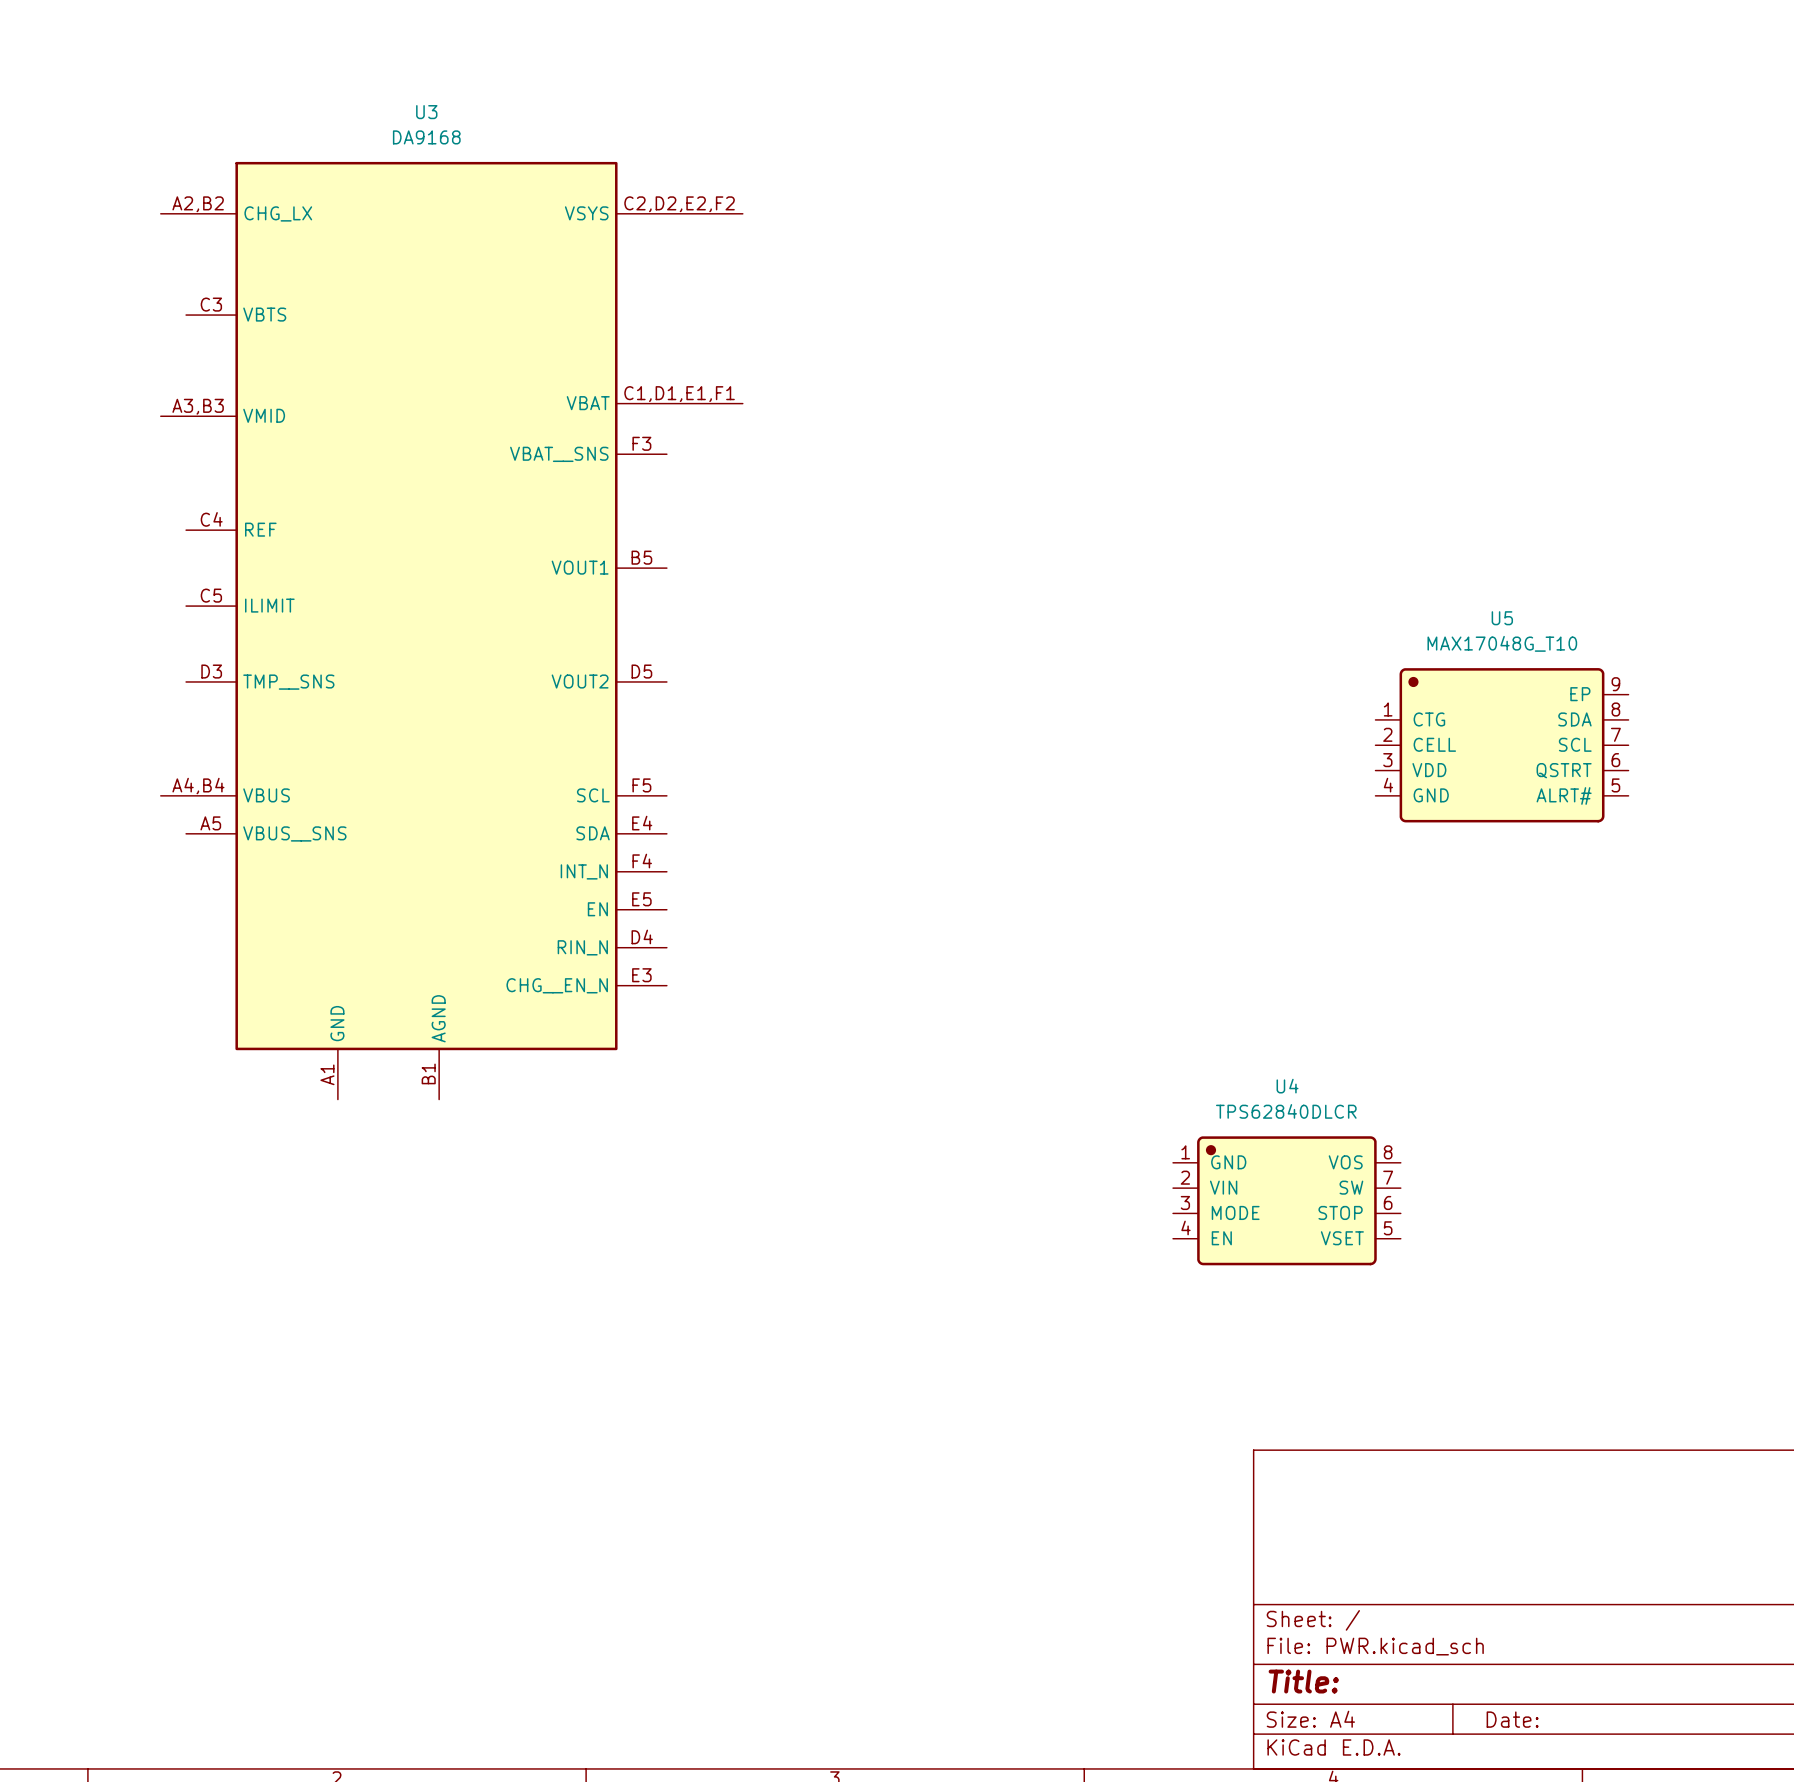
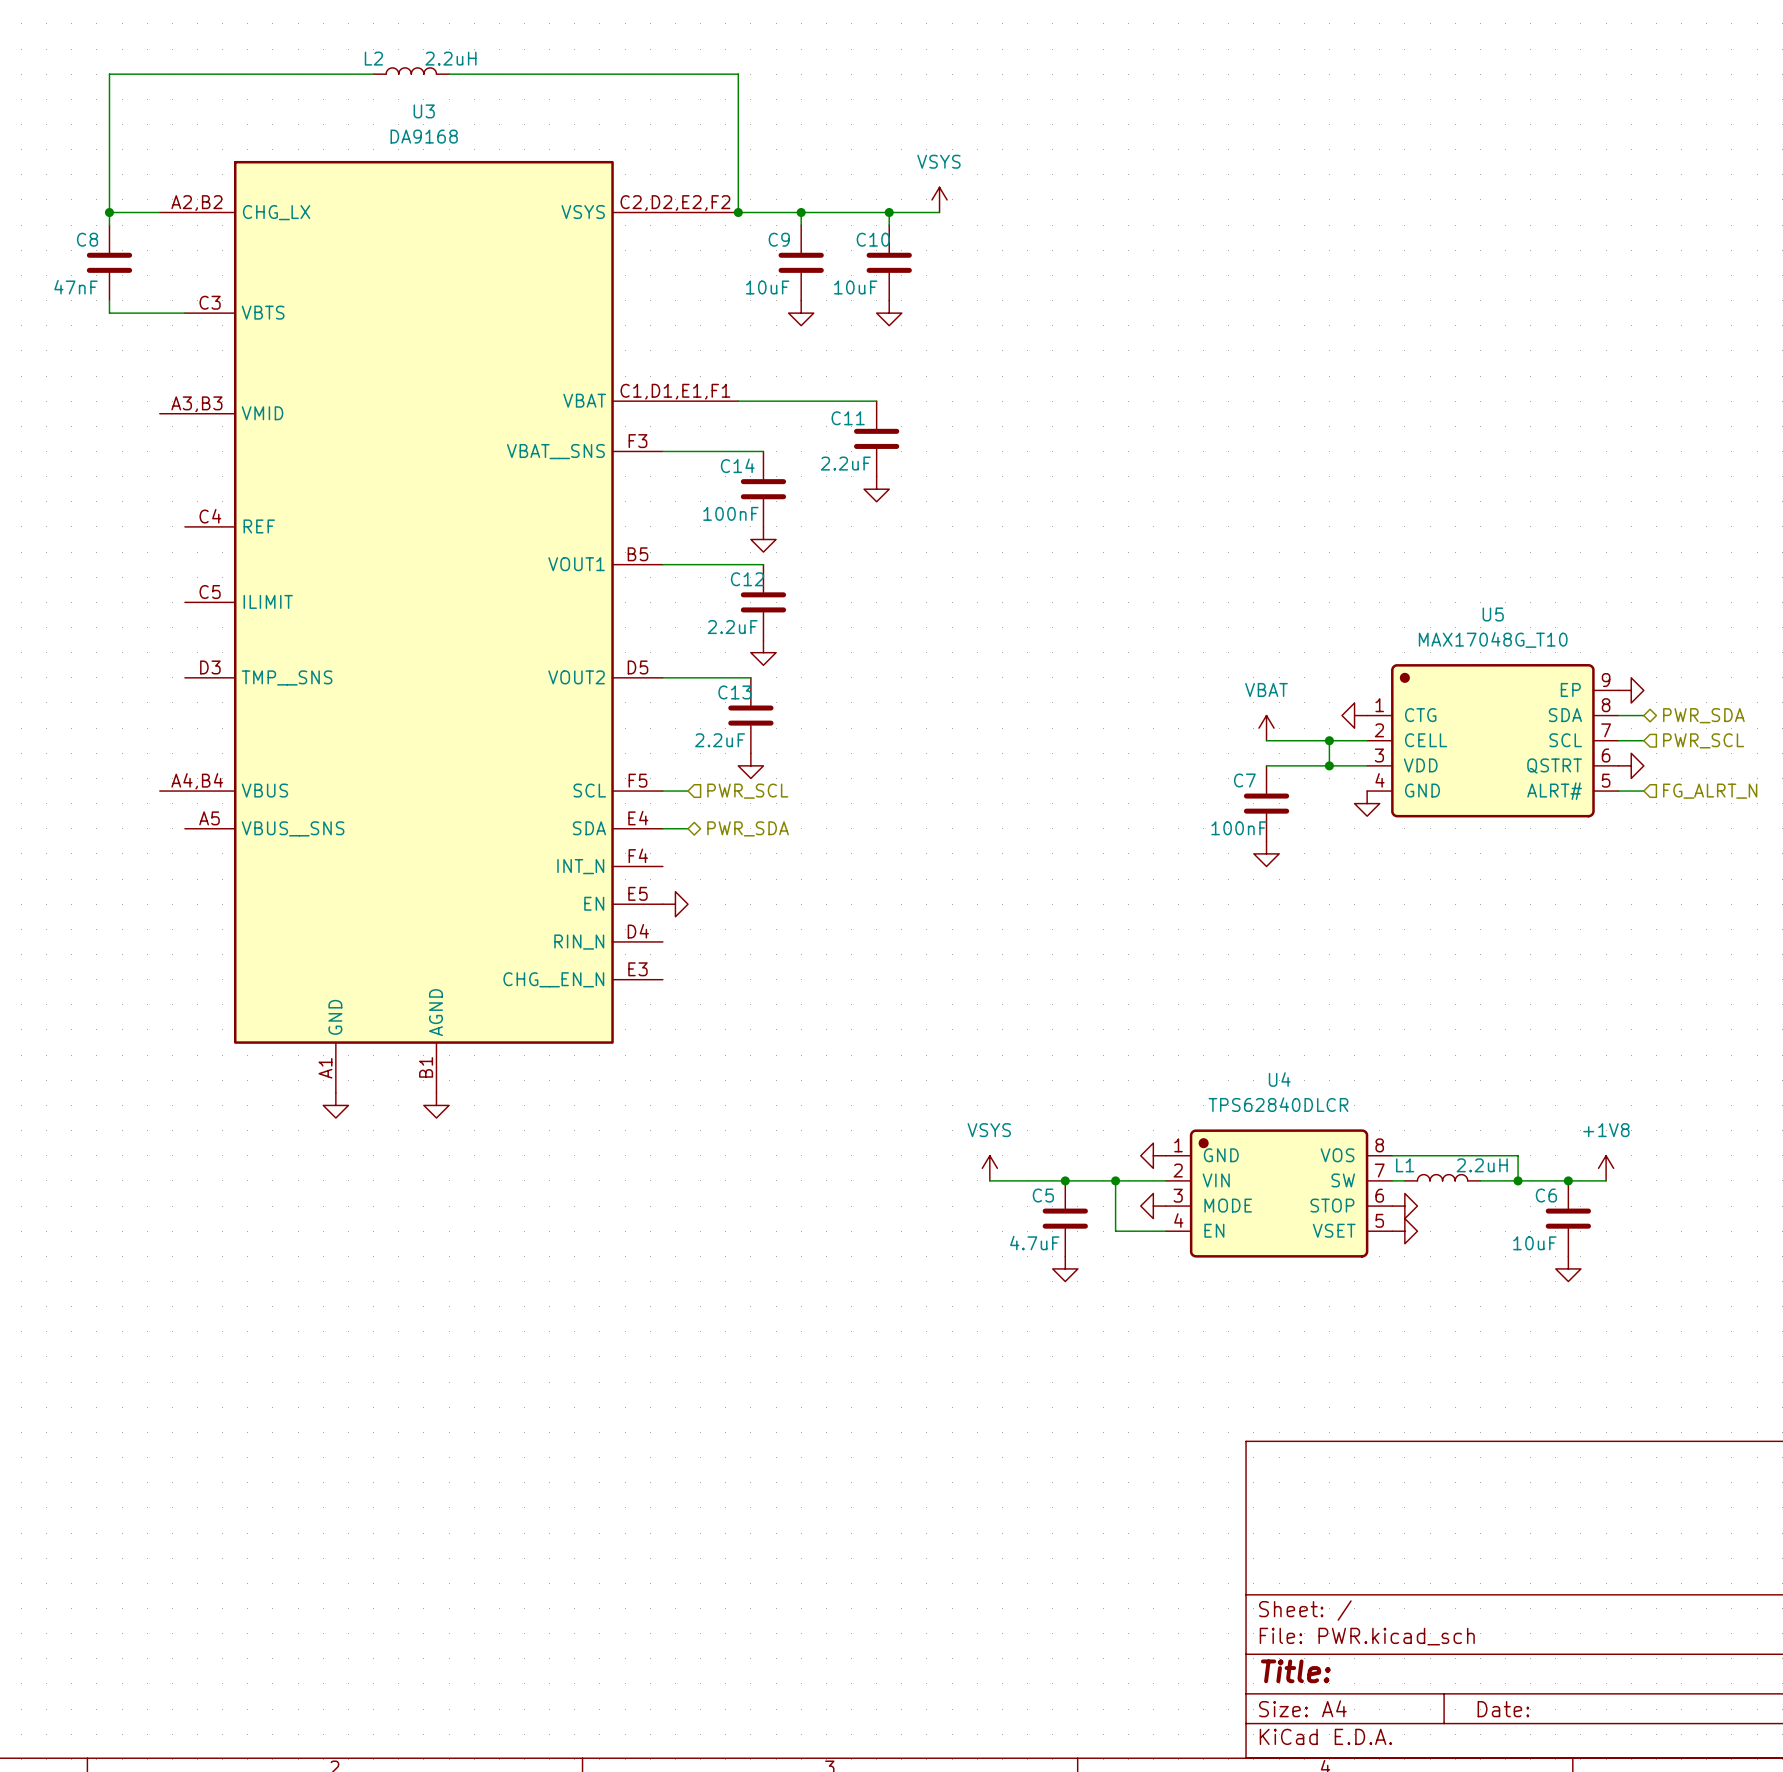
L2: none -> 2.2uH (411, 71)
wire: none -> (373, 74) (109, 74) (109, 225)
wire: none -> (449, 74) (738, 74) (738, 212) (939, 212)
power symbol: none -> VSYS (939, 199)
wire: none -> (109, 212) (159, 212)
junction: none -> (109, 212)
junction: none -> (738, 212)
wire: none -> (801, 212) (801, 225)
junction: none -> (801, 212)
wire: none -> (889, 212) (889, 225)
junction: none -> (889, 212)
C8: none -> 47nF (109, 262)
C9: none -> 10uF (801, 262)
C10: none -> 10uF (889, 262)
wire: none -> (109, 300) (109, 313) (184, 313)
power symbol: none -> (801, 313)
power symbol: none -> (889, 313)
wire: none -> (738, 401) (876, 401)
C11: none -> 2.2uF (876, 438)
wire: none -> (662, 451) (763, 451)
C14: none -> 100nF (763, 489)
power symbol: none -> (876, 489)
power symbol: none -> (763, 539)
wire: none -> (662, 564) (763, 564)
C12: none -> 2.2uF (763, 602)
power symbol: none -> (763, 652)
wire: none -> (662, 677) (750, 677)
power symbol: none -> (1631, 690)
C13: none -> 2.2uF (750, 715)
power symbol: none -> (1354, 715)
wire: none -> (1618, 715) (1643, 715)
hierarchical label: none -> PWR_SDA (1703, 715)
power symbol: none -> VBAT (1266, 728)
wire: none -> (1266, 740) (1367, 740)
wire: none -> (1329, 740) (1329, 765)
junction: none -> (1329, 740)
wire: none -> (1618, 740) (1643, 740)
hierarchical label: none -> PWR_SCL (1703, 740)
power symbol: none -> (750, 765)
wire: none -> (1266, 765) (1367, 765)
junction: none -> (1329, 765)
power symbol: none -> (1631, 765)
wire: none -> (662, 791) (688, 791)
hierarchical label: none -> PWR_SCL (747, 791)
wire: none -> (1618, 791) (1643, 791)
hierarchical label: none -> FG_ALRT_N (1710, 791)
C7: none -> 100nF (1266, 803)
power symbol: none -> (1367, 803)
wire: none -> (662, 828) (688, 828)
hierarchical label: none -> PWR_SDA (748, 828)
power symbol: none -> (1266, 853)
power symbol: none -> (675, 904)
power symbol: none -> (335, 1105)
power symbol: none -> (436, 1105)
power symbol: none -> (1153, 1155)
wire: none -> (1392, 1155) (1518, 1155) (1518, 1180)
power symbol: none -> VSYS (989, 1168)
power symbol: none -> +1V8 (1606, 1168)
L1: none -> 2.2uH (1442, 1177)
wire: none -> (989, 1180) (1165, 1180)
junction: none -> (1065, 1180)
wire: none -> (1115, 1180) (1115, 1231) (1165, 1231)
junction: none -> (1115, 1180)
wire: none -> (1392, 1180) (1404, 1180)
wire: none -> (1480, 1180) (1606, 1180)
junction: none -> (1518, 1180)
junction: none -> (1568, 1180)
power symbol: none -> (1153, 1206)
power symbol: none -> (1404, 1206)
C5: none -> 4.7uF (1065, 1218)
C6: none -> 10uF (1568, 1218)
power symbol: none -> (1404, 1231)
power symbol: none -> (1065, 1268)
power symbol: none -> (1568, 1268)

